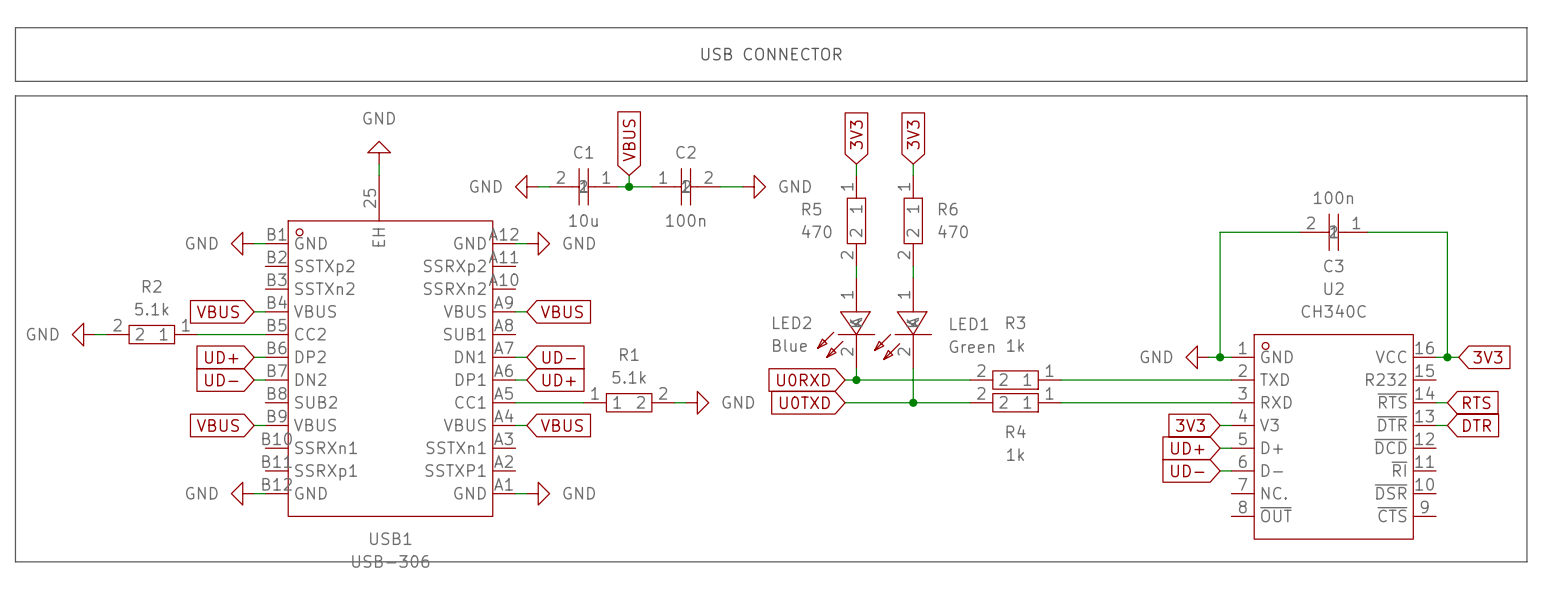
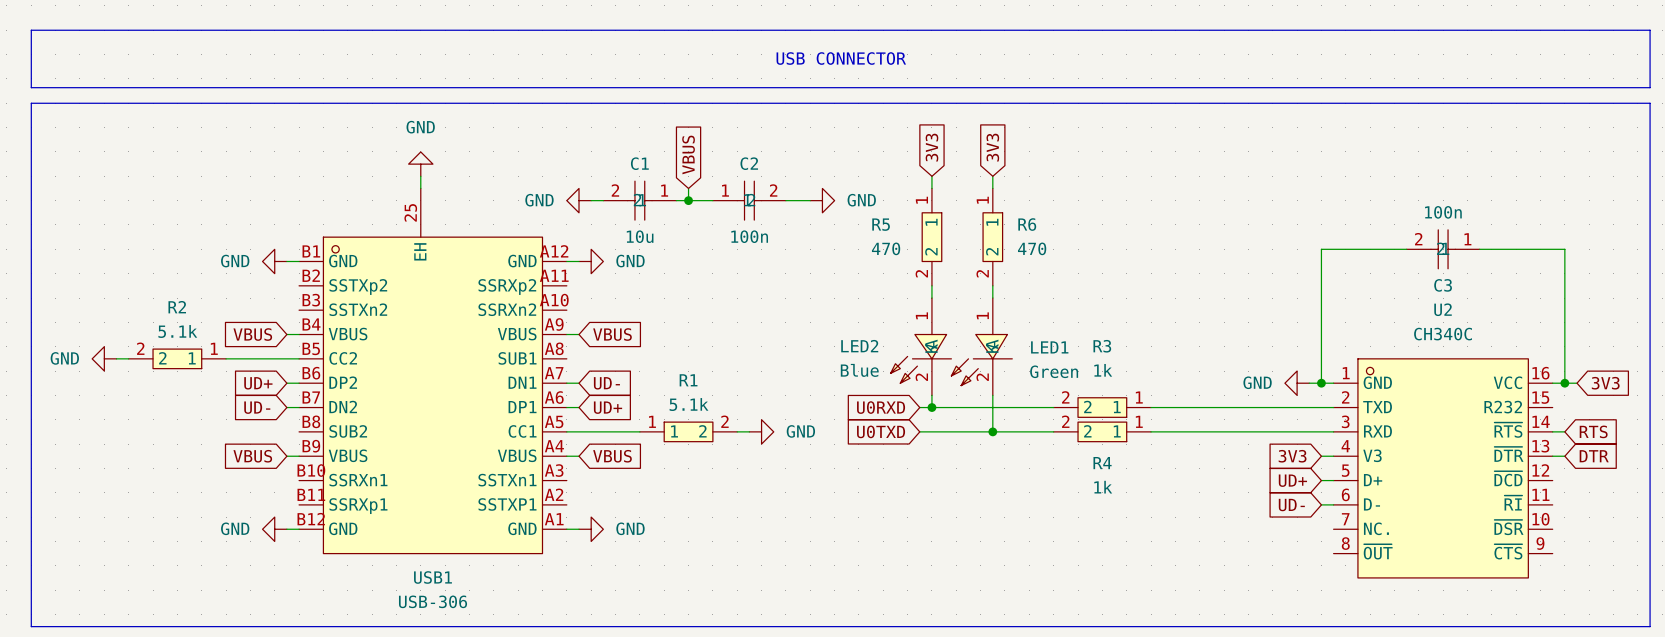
line: (15, 561) (1526, 561) -> (31, 602) (31, 626) (1650, 626) (1650, 602)

